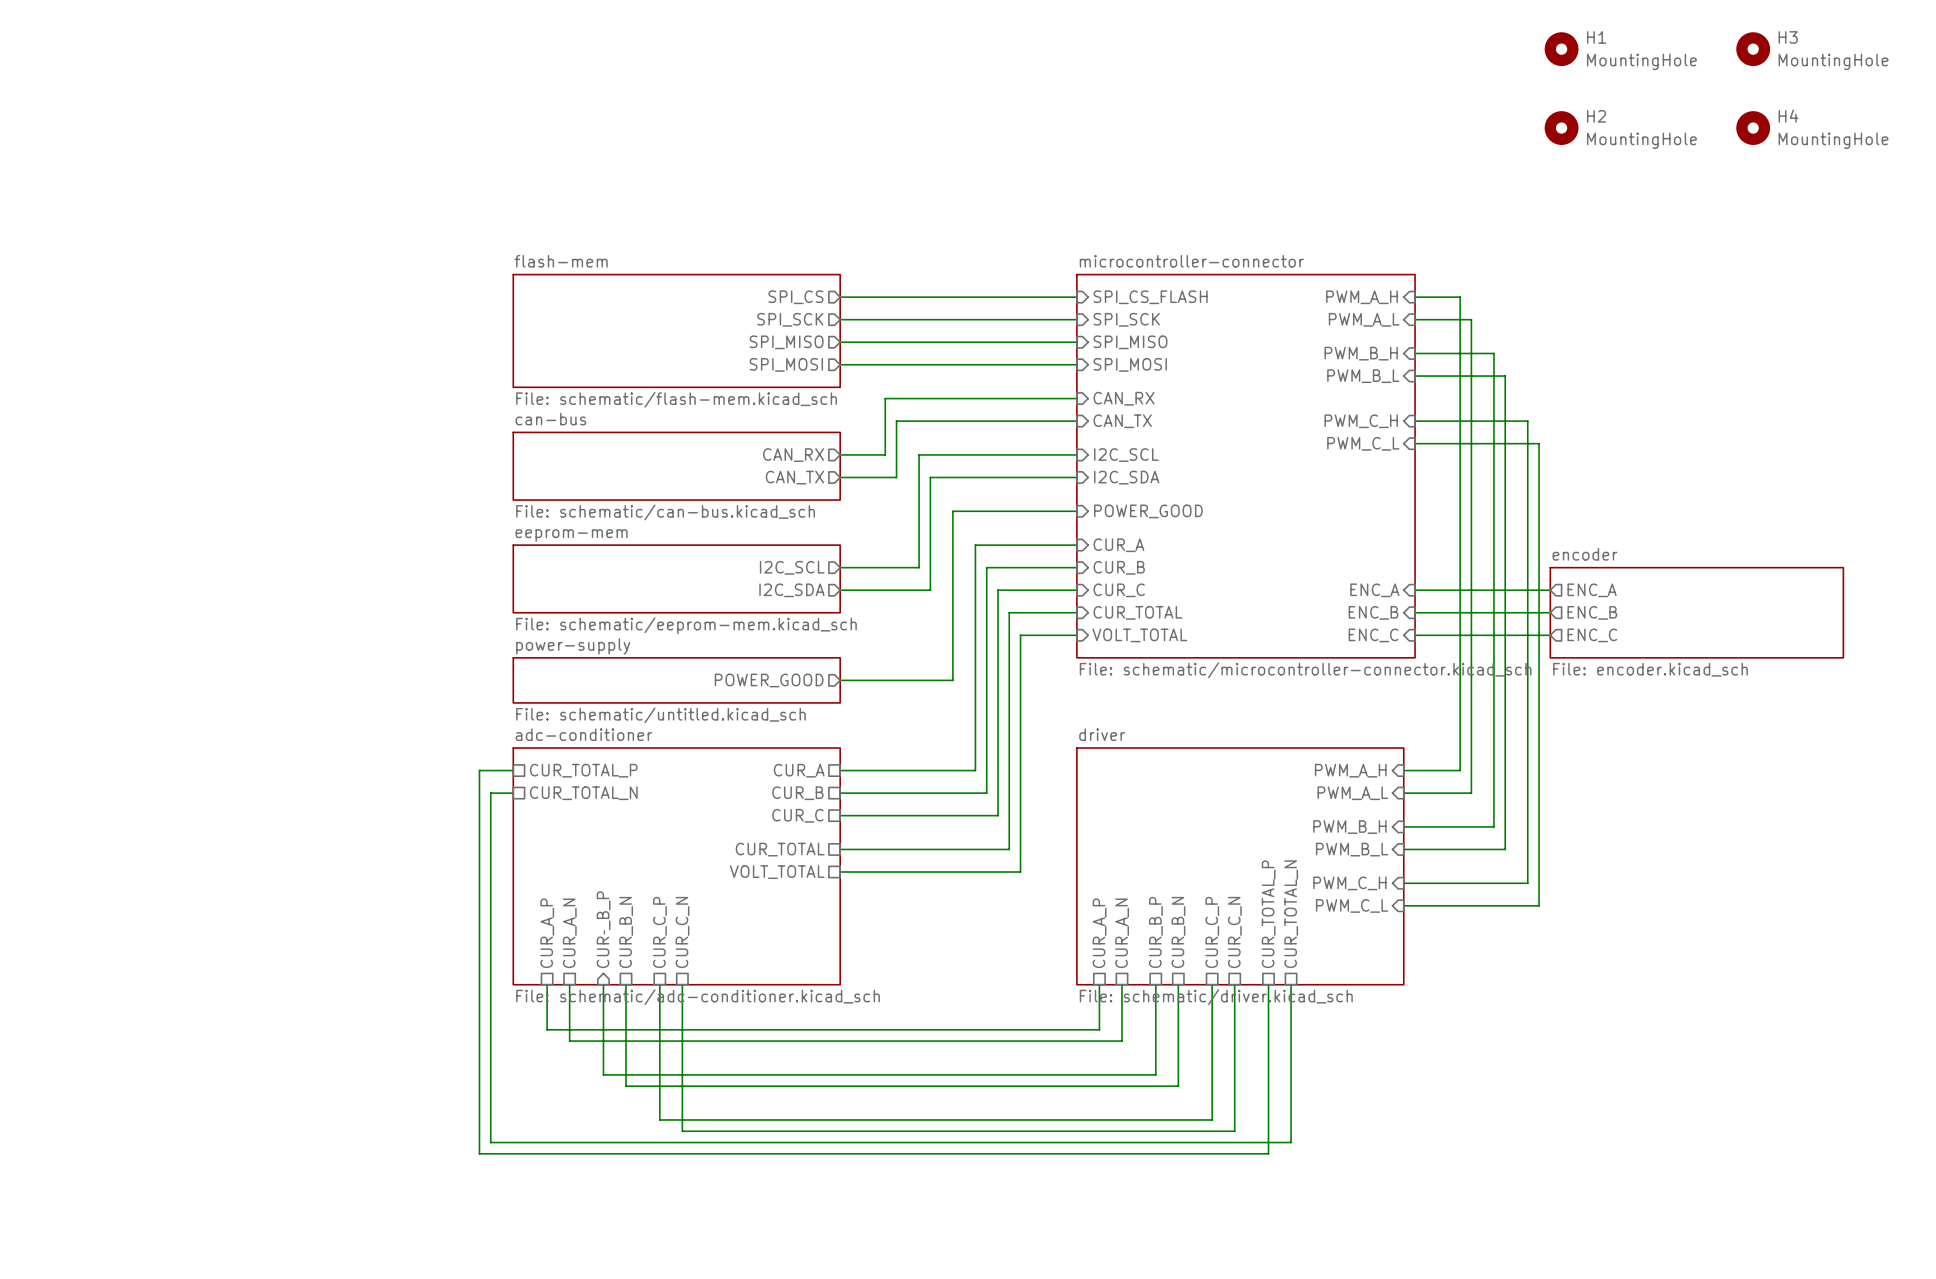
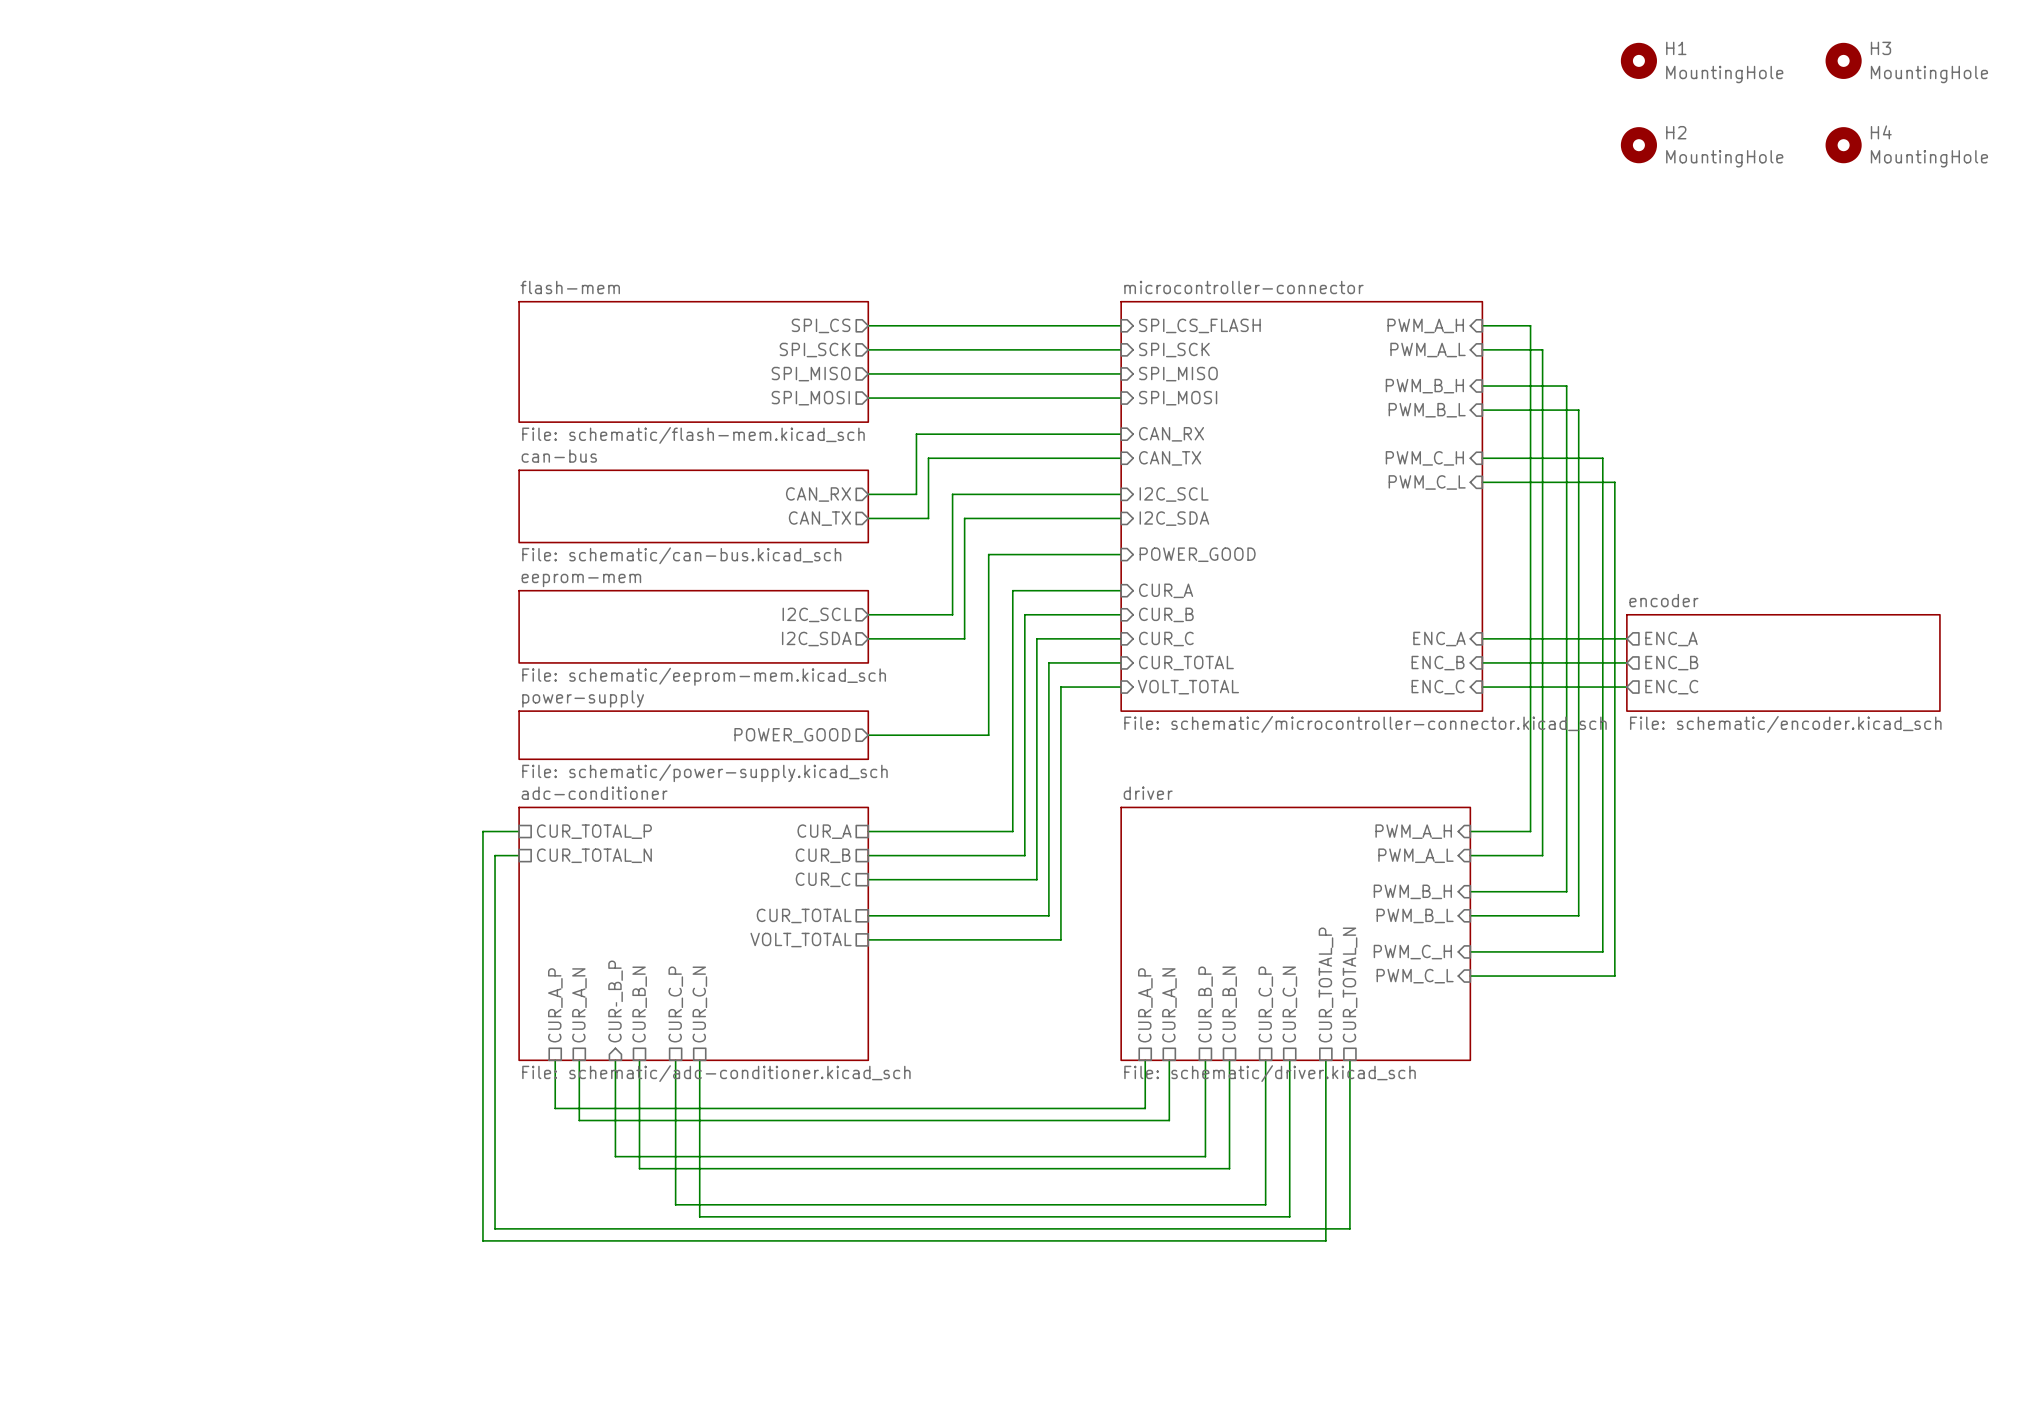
sheet encoder value: File: encoder.kicad_sch (1650, 669) -> File: schematic/encoder.kicad_sch (1785, 724)
sheet power-supply value: File: schematic/untitled.kicad_sch (660, 715) -> File: schematic/power-supply.kicad_sch (704, 773)

